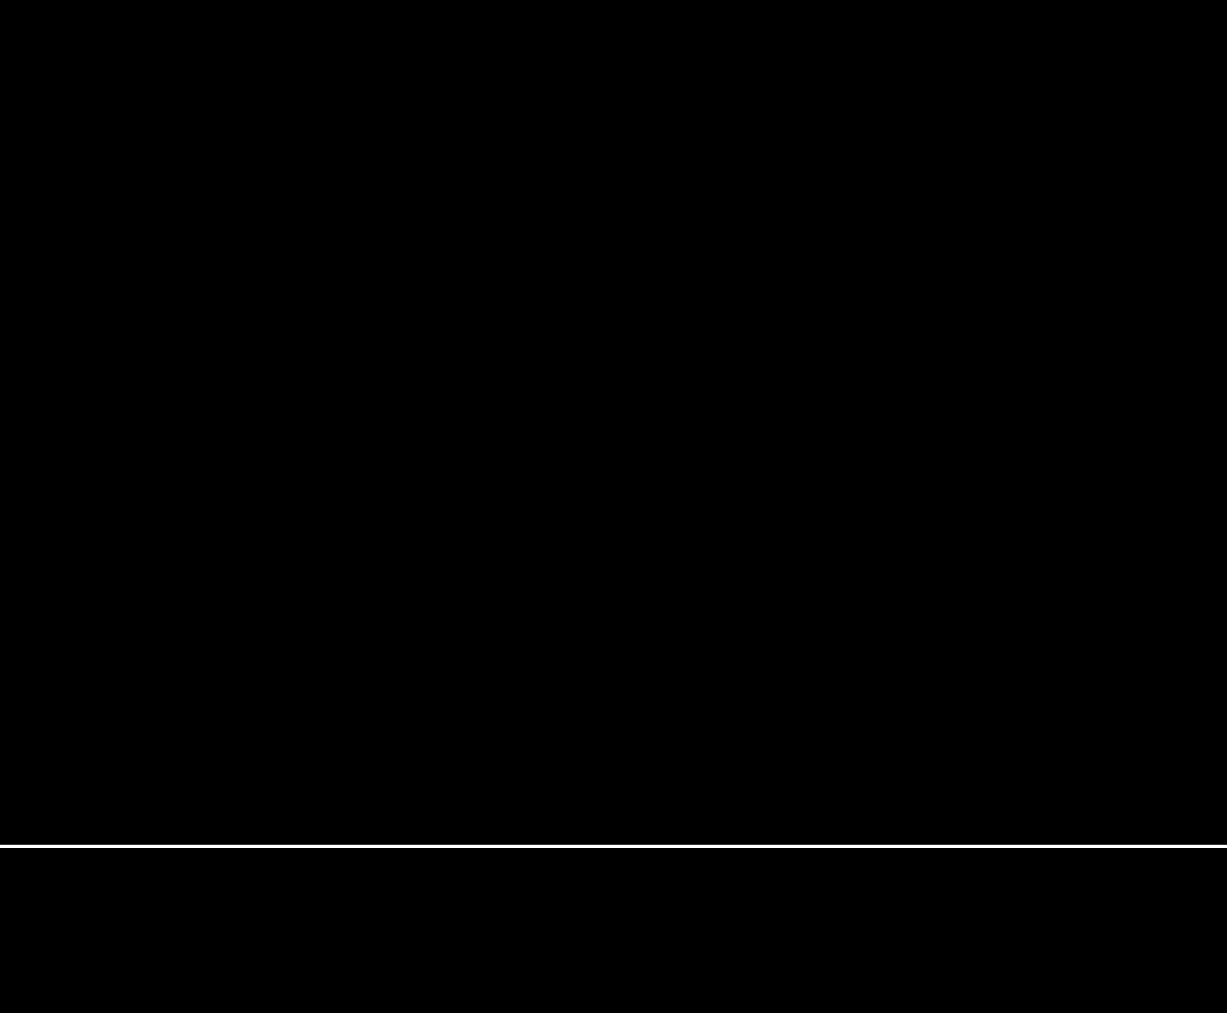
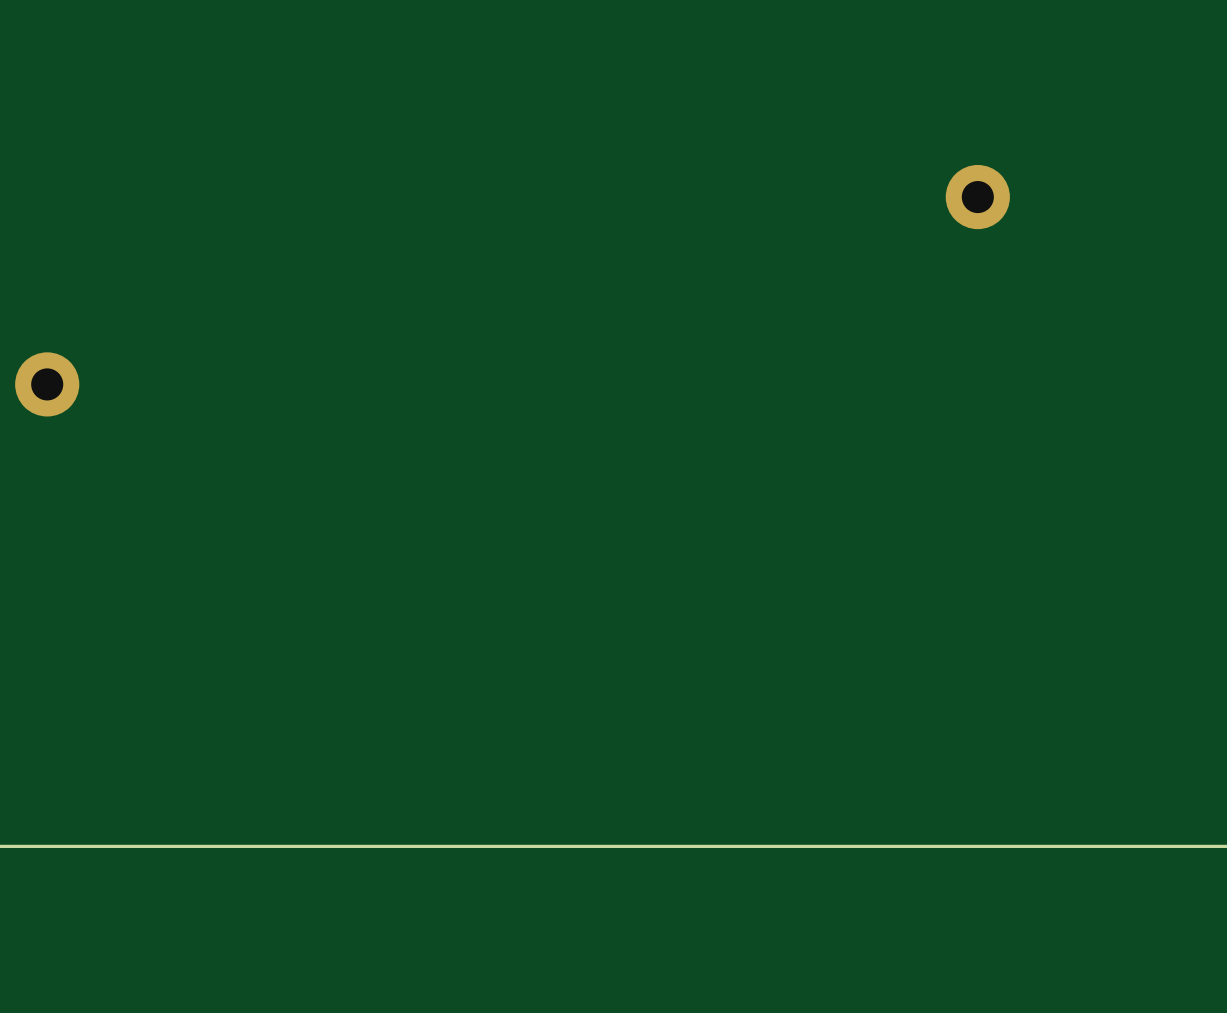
via: none -> (977, 197)
via: none -> (47, 384)

